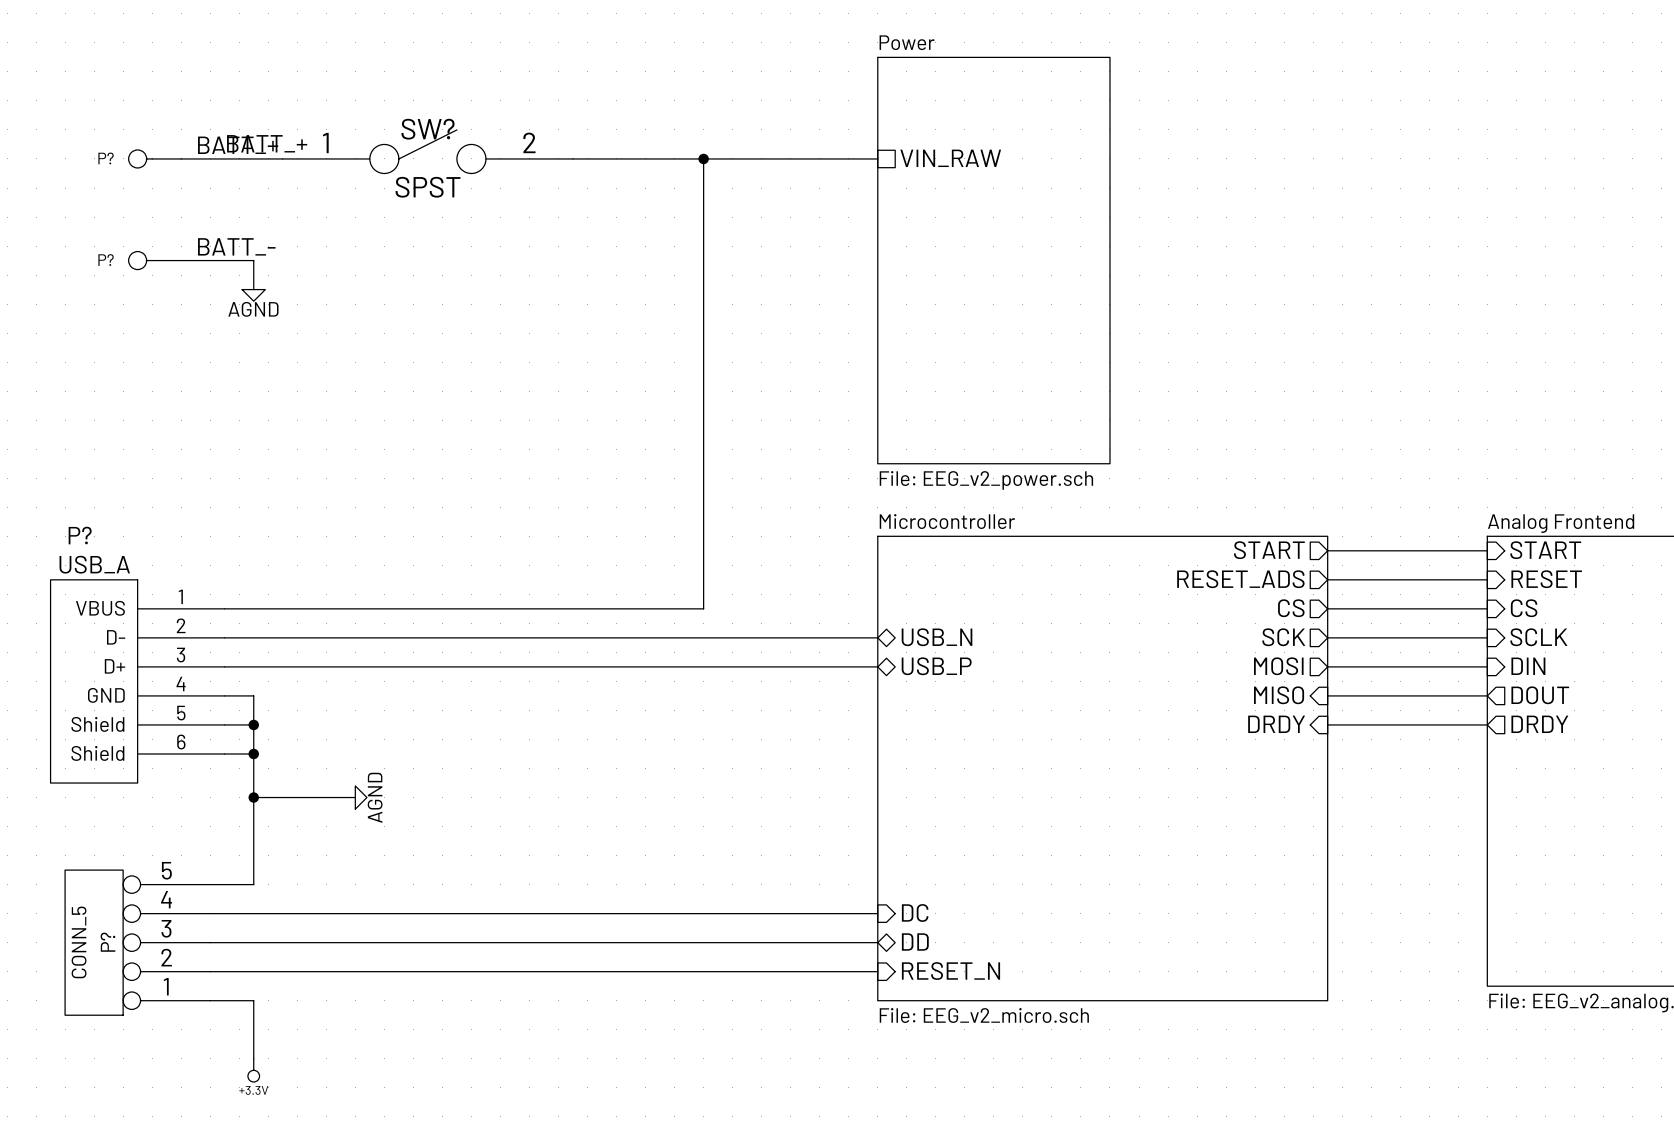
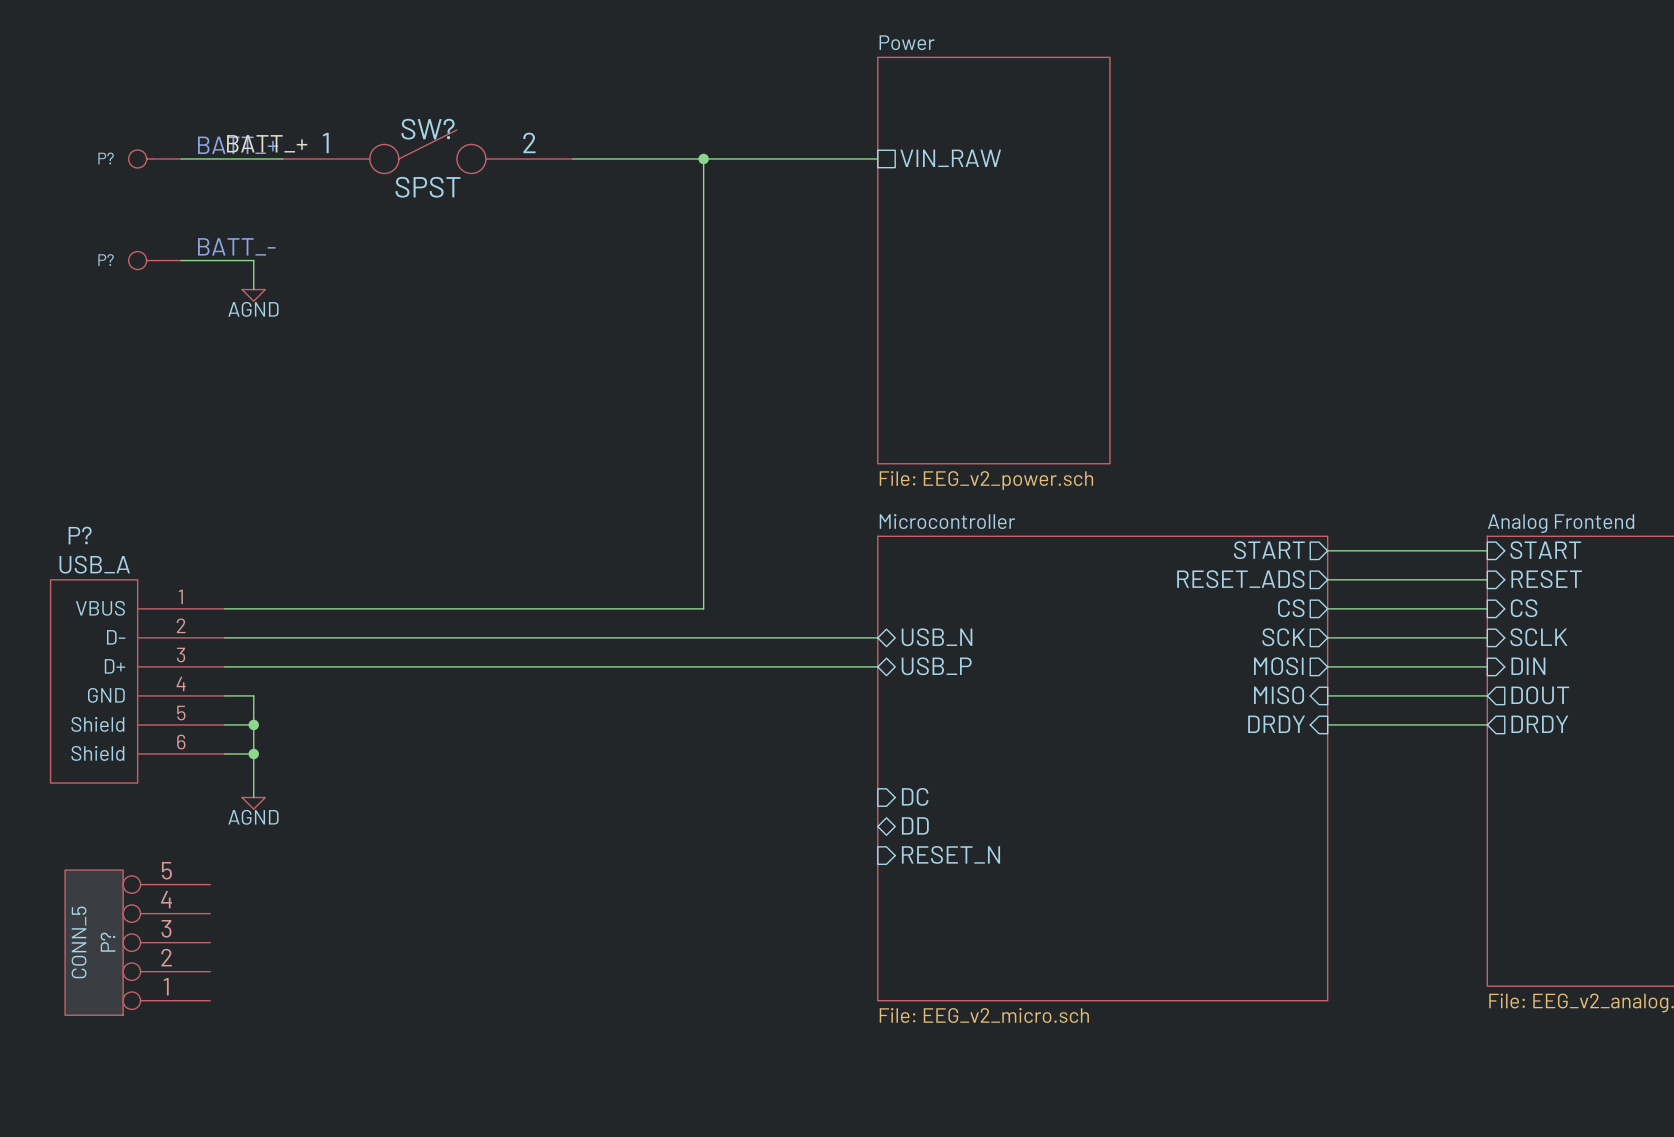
junction: (253, 797) -> none
wire: (355, 797) (253, 797) (253, 884) (210, 884) -> none
power symbol rotation: 0° (361, 797) -> 90° clockwise (253, 803)
power symbol position: AGND (361, 797) -> AGND (253, 803)
sheet pin position: DC (915, 912) -> DC (915, 796)
wire: (210, 913) (877, 913) -> none
wire: (210, 942) (877, 942) -> none
sheet pin position: DD (915, 942) -> DD (915, 825)
wire: (210, 971) (877, 971) -> none
sheet pin position: RESET_N (950, 971) -> RESET_N (950, 854)
wire: (210, 1000) (253, 1000) (253, 1058) -> none
power symbol: +3.3V (253, 1070) -> none

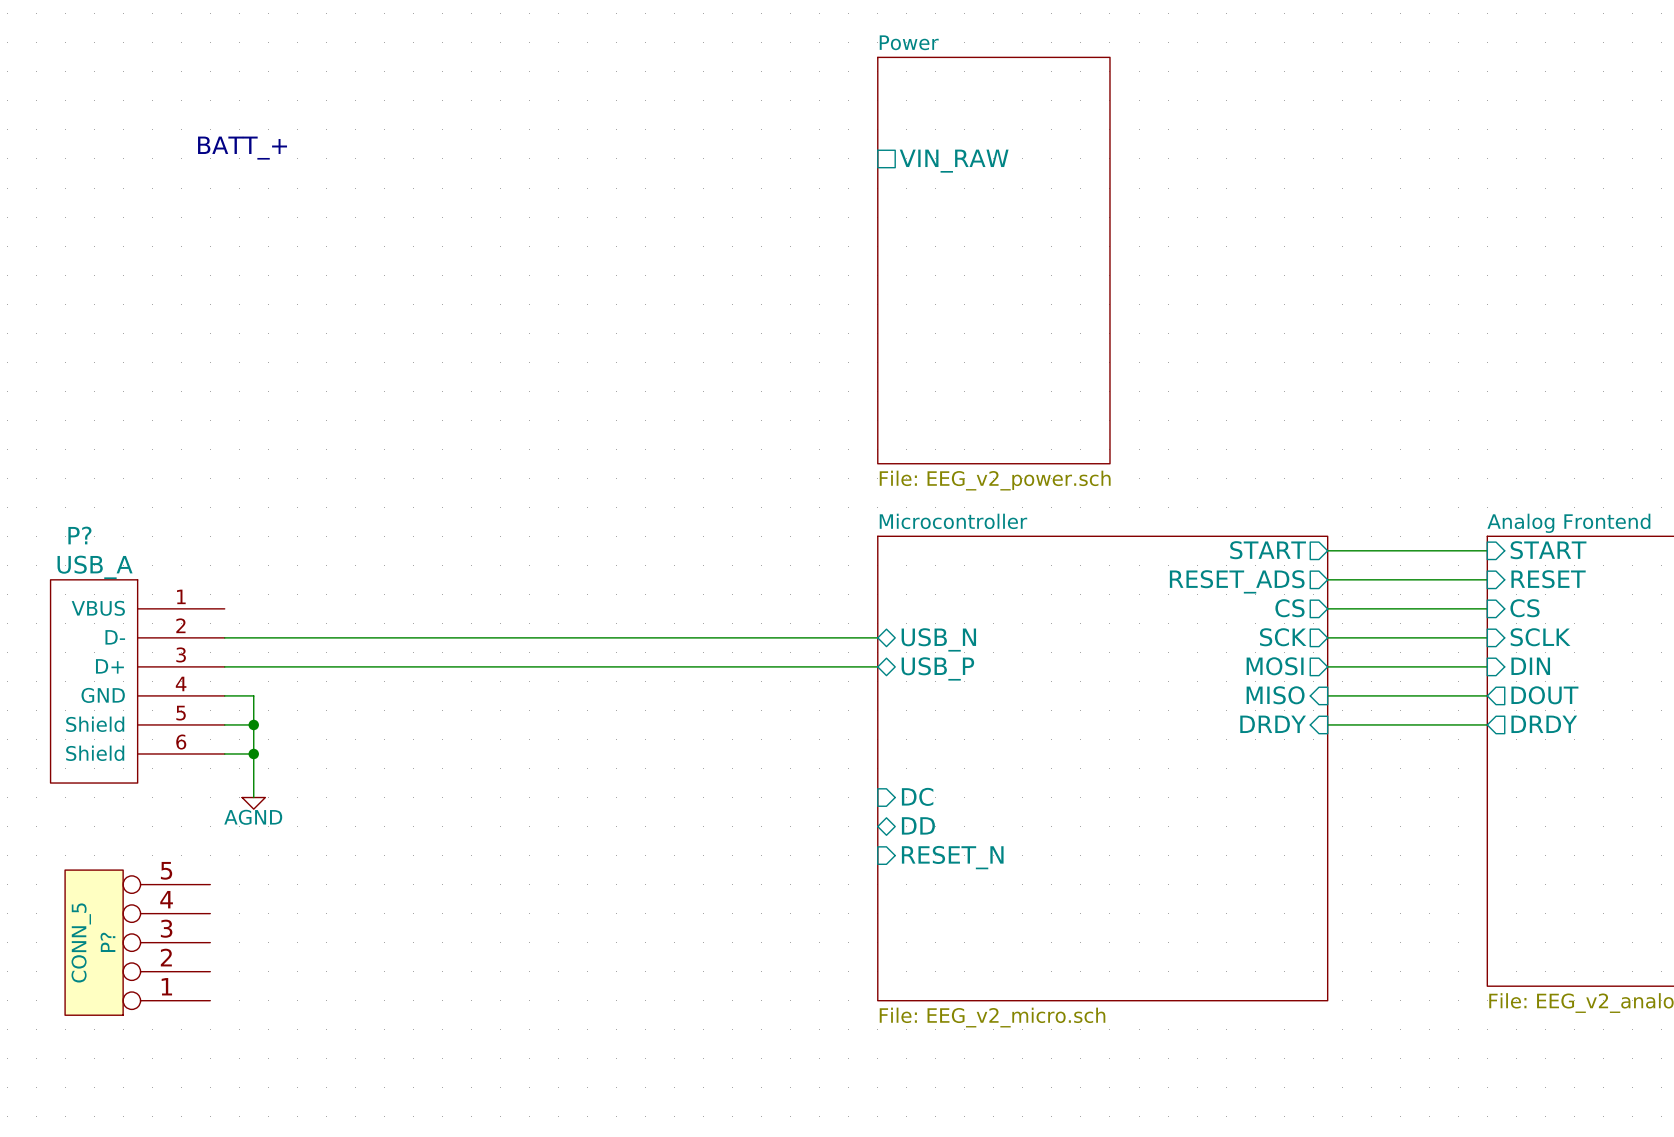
label: BATT_+ (267, 143) -> none
SW?: SPST (427, 151) -> none
P?: (154, 158) -> none
wire: (181, 158) (282, 158) -> none
wire: (573, 158) (877, 158) -> none
wire: (703, 158) (703, 608) (224, 608) -> none
junction: (703, 158) -> none
text: BATT_- (236, 246) -> none
P?: (154, 260) -> none
wire: (181, 260) (253, 260) (253, 289) -> none
power symbol: AGND (253, 295) -> none

